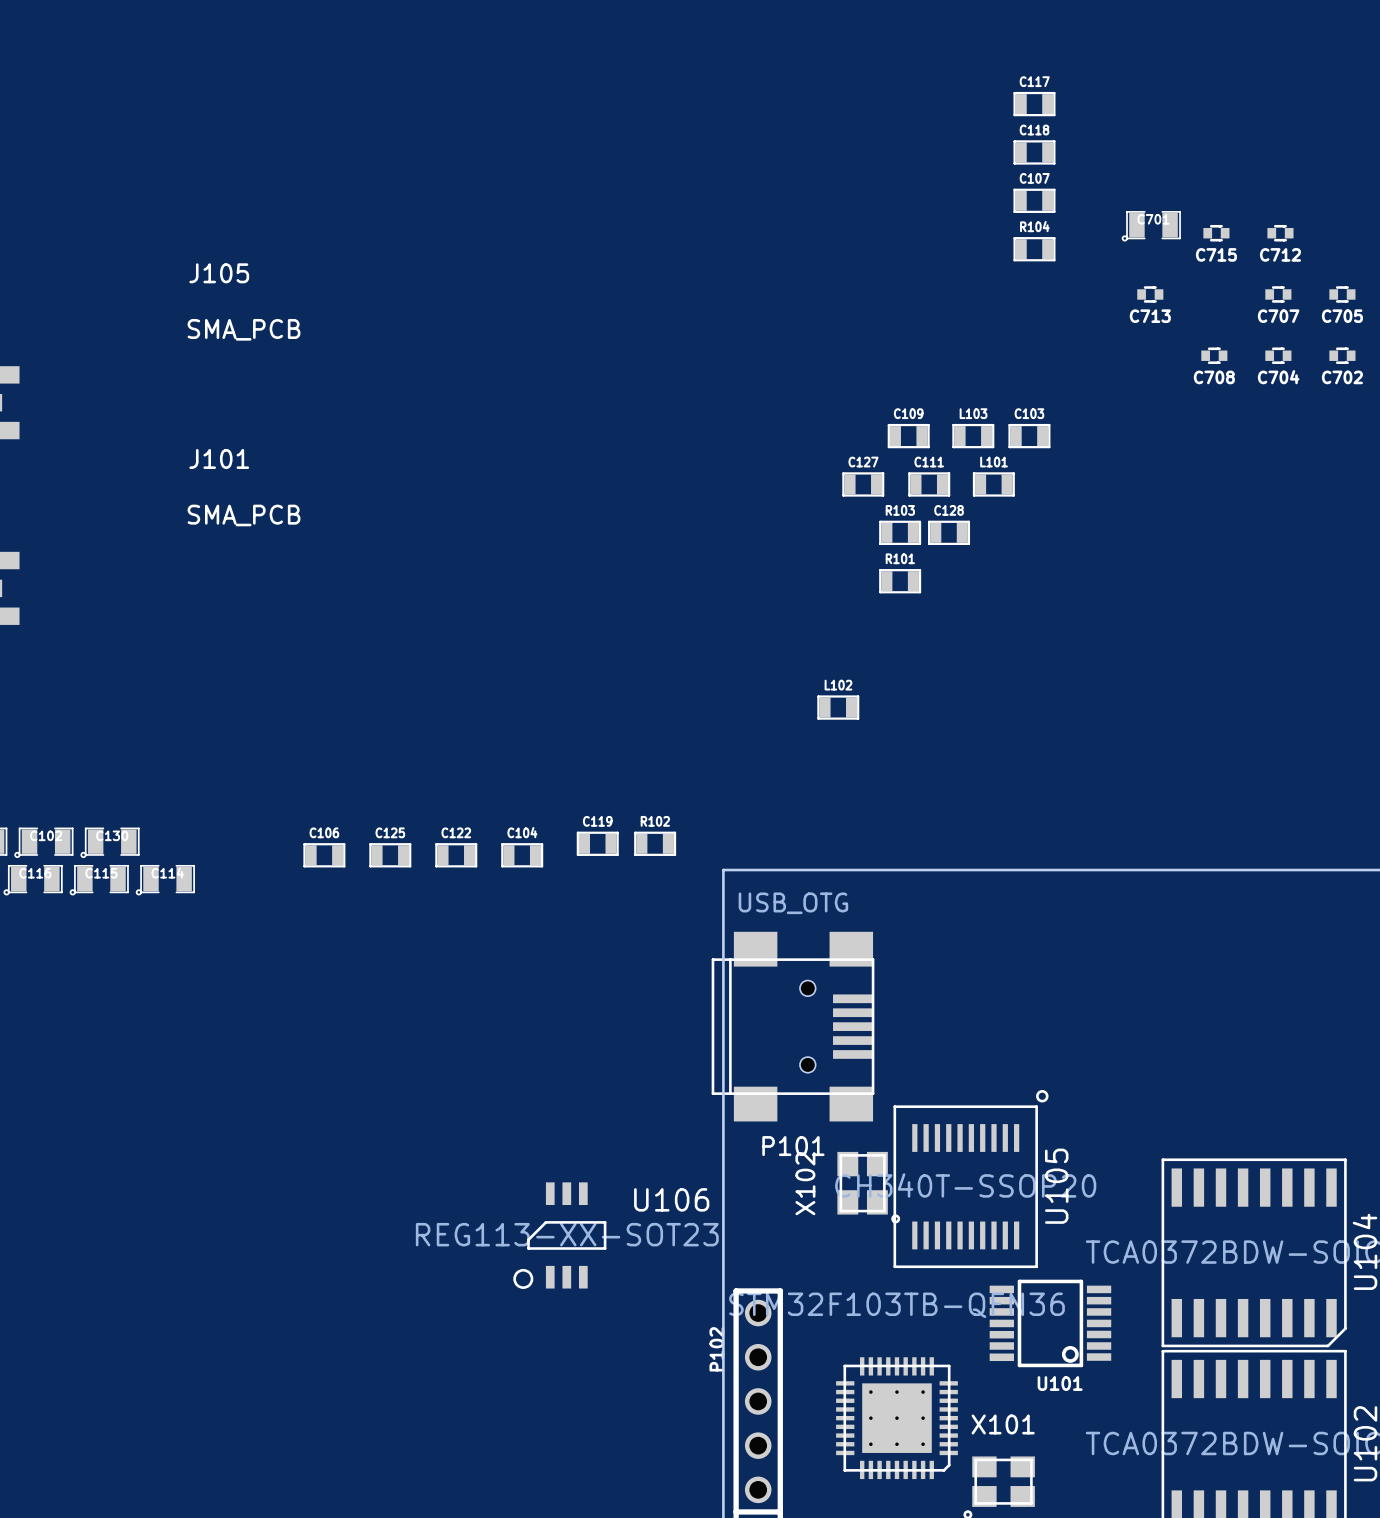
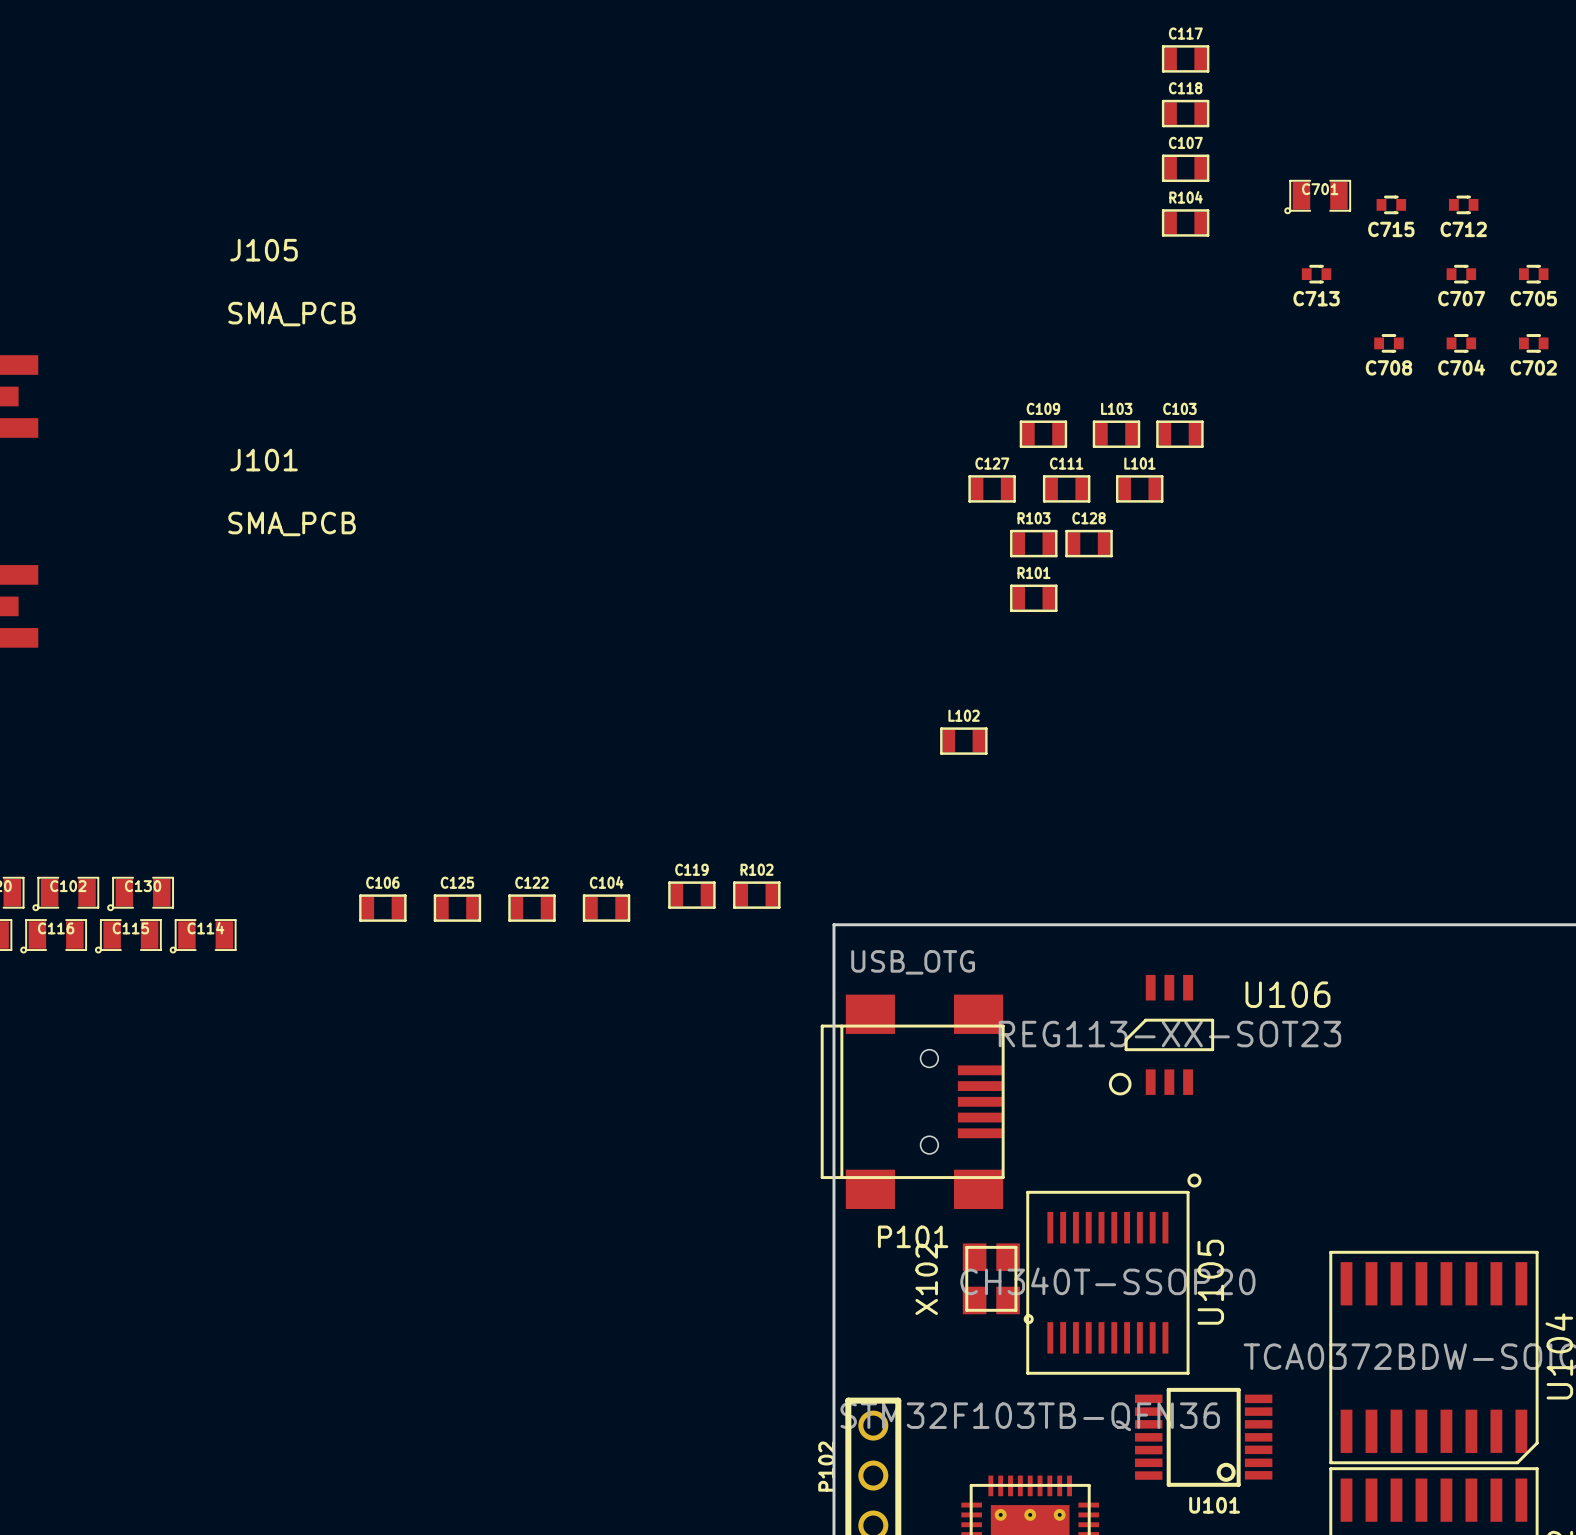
U106 position: (559, 1235) -> (1161, 1035)

